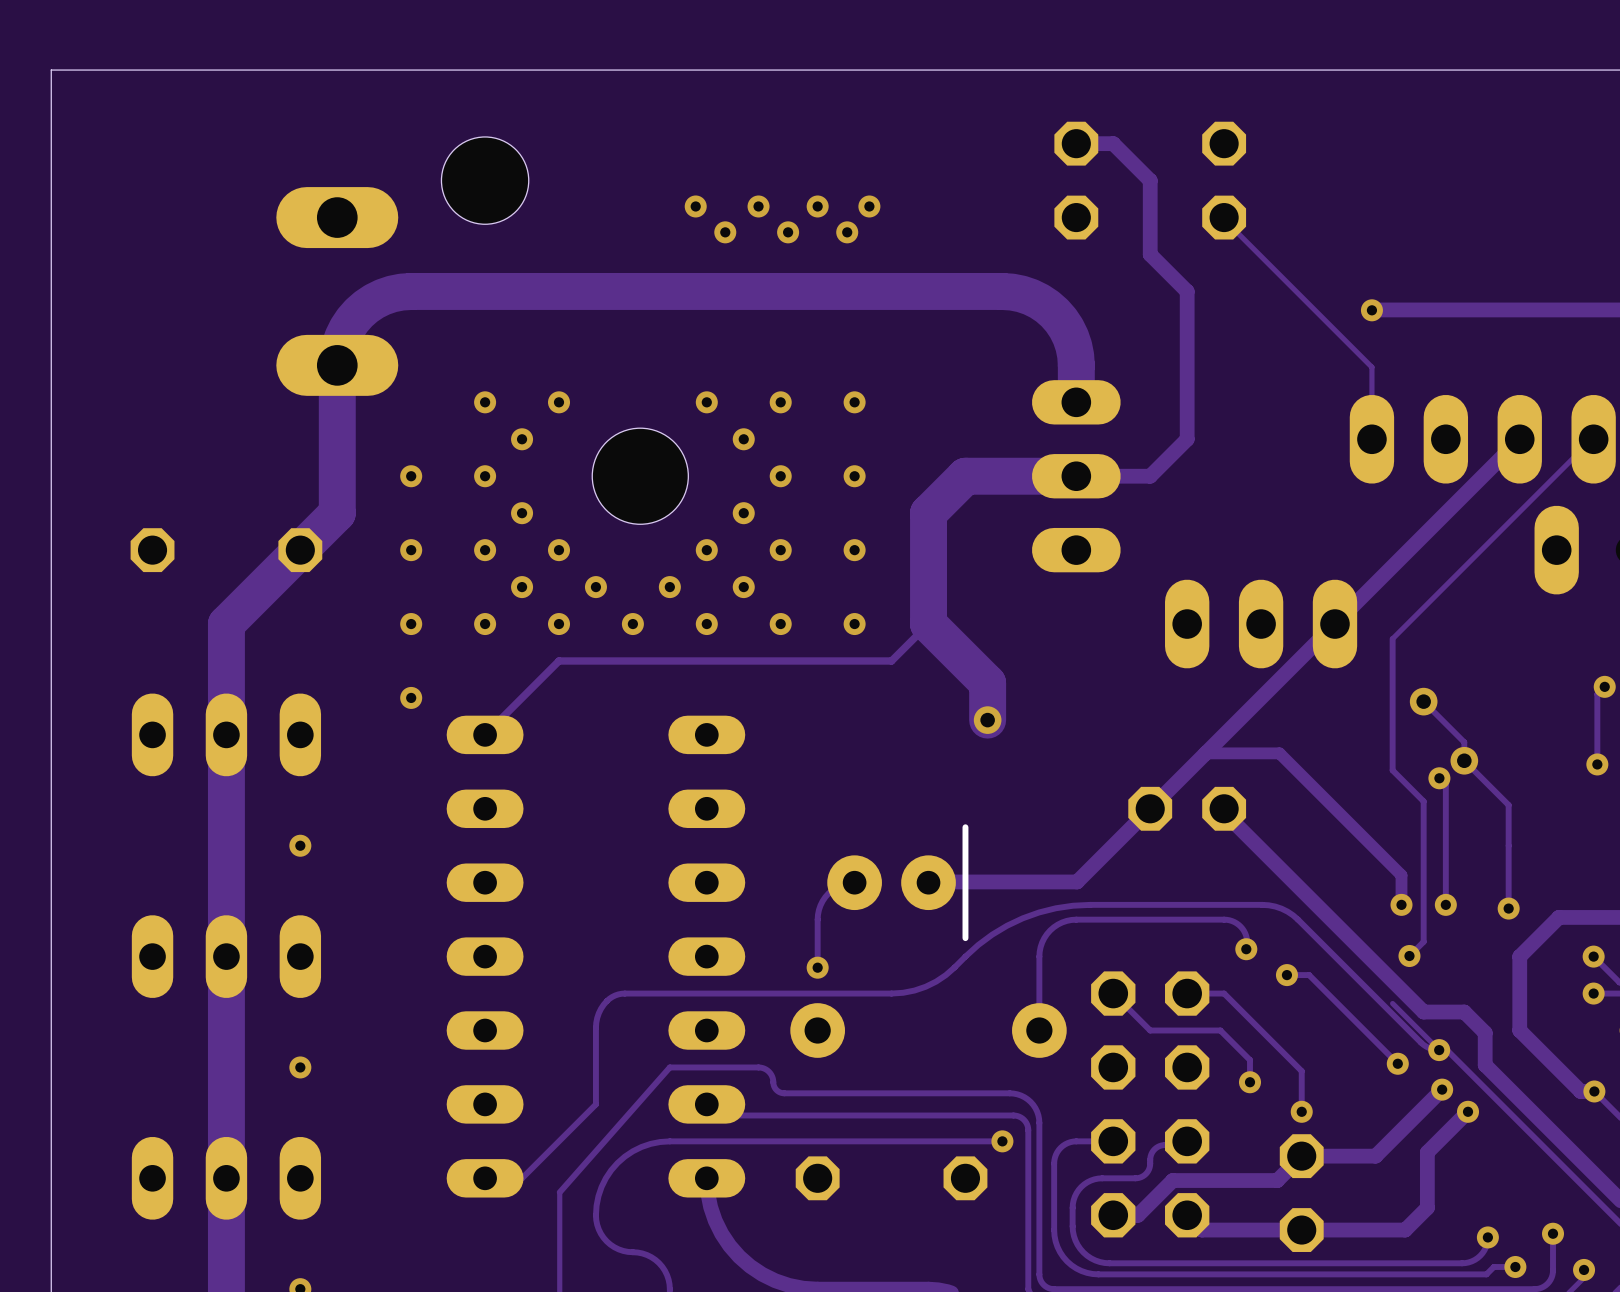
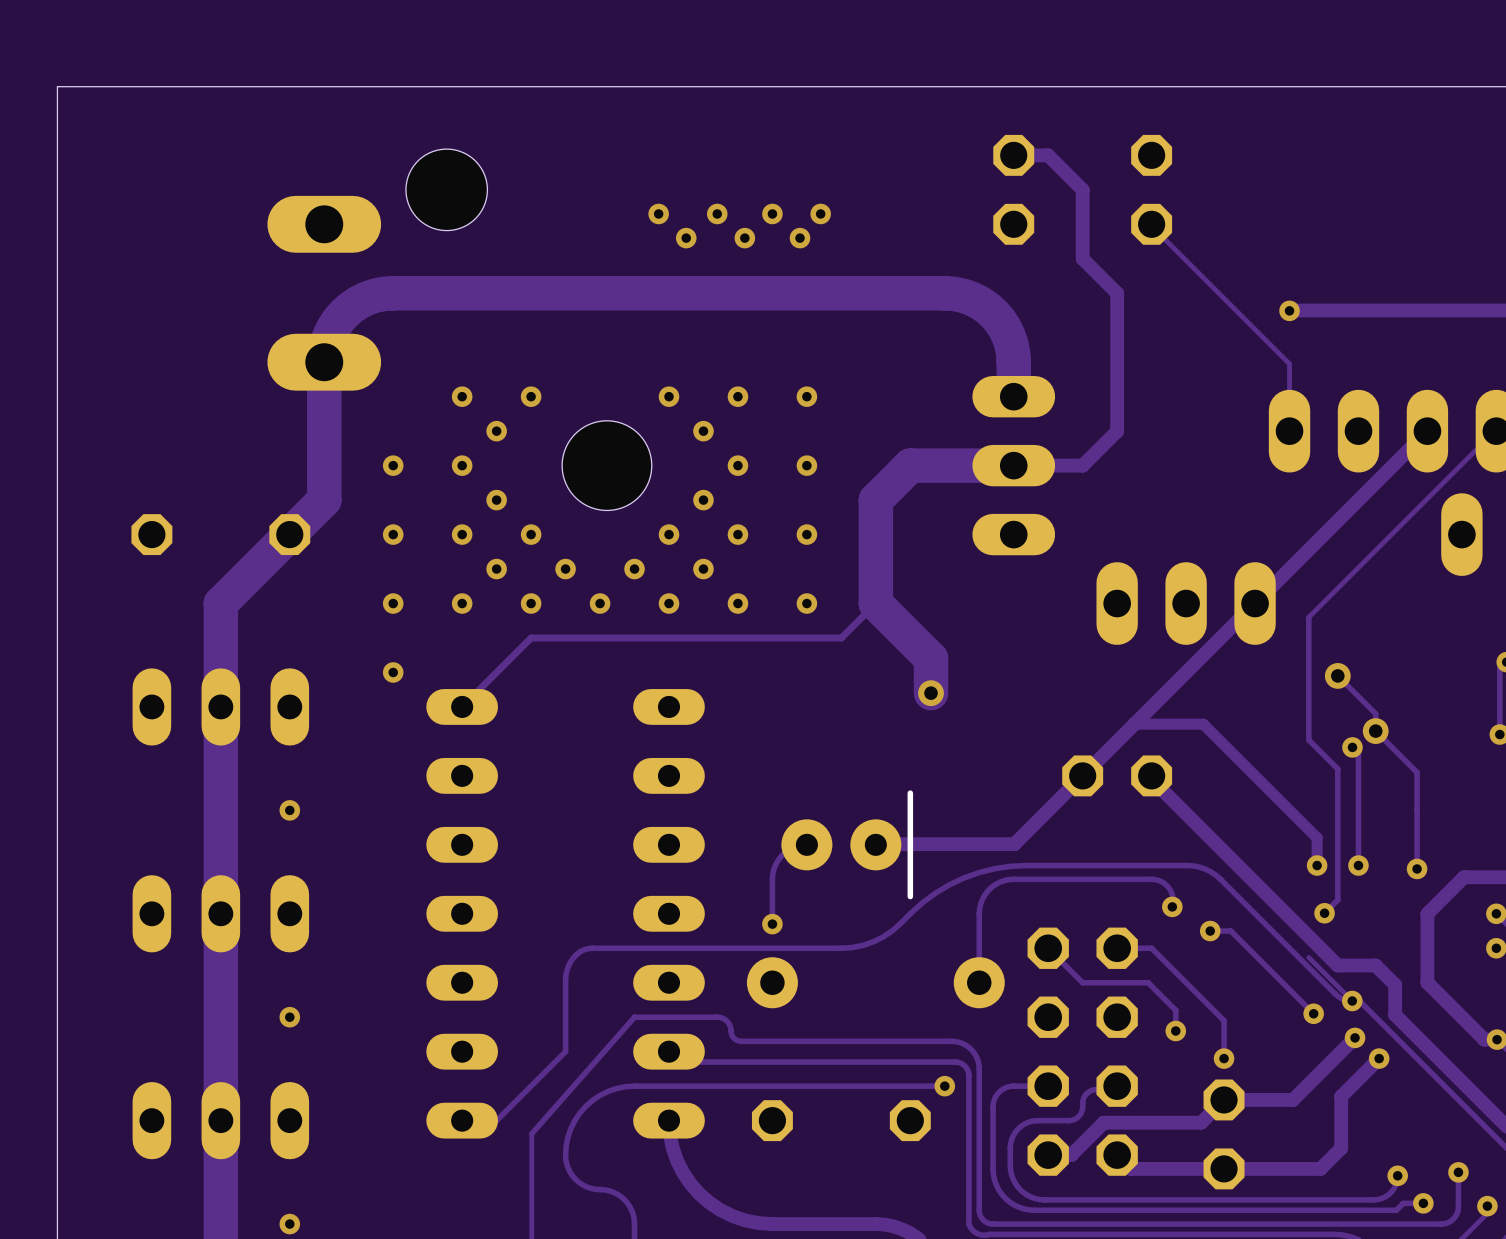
hole position: (485, 180) -> (446, 189)

